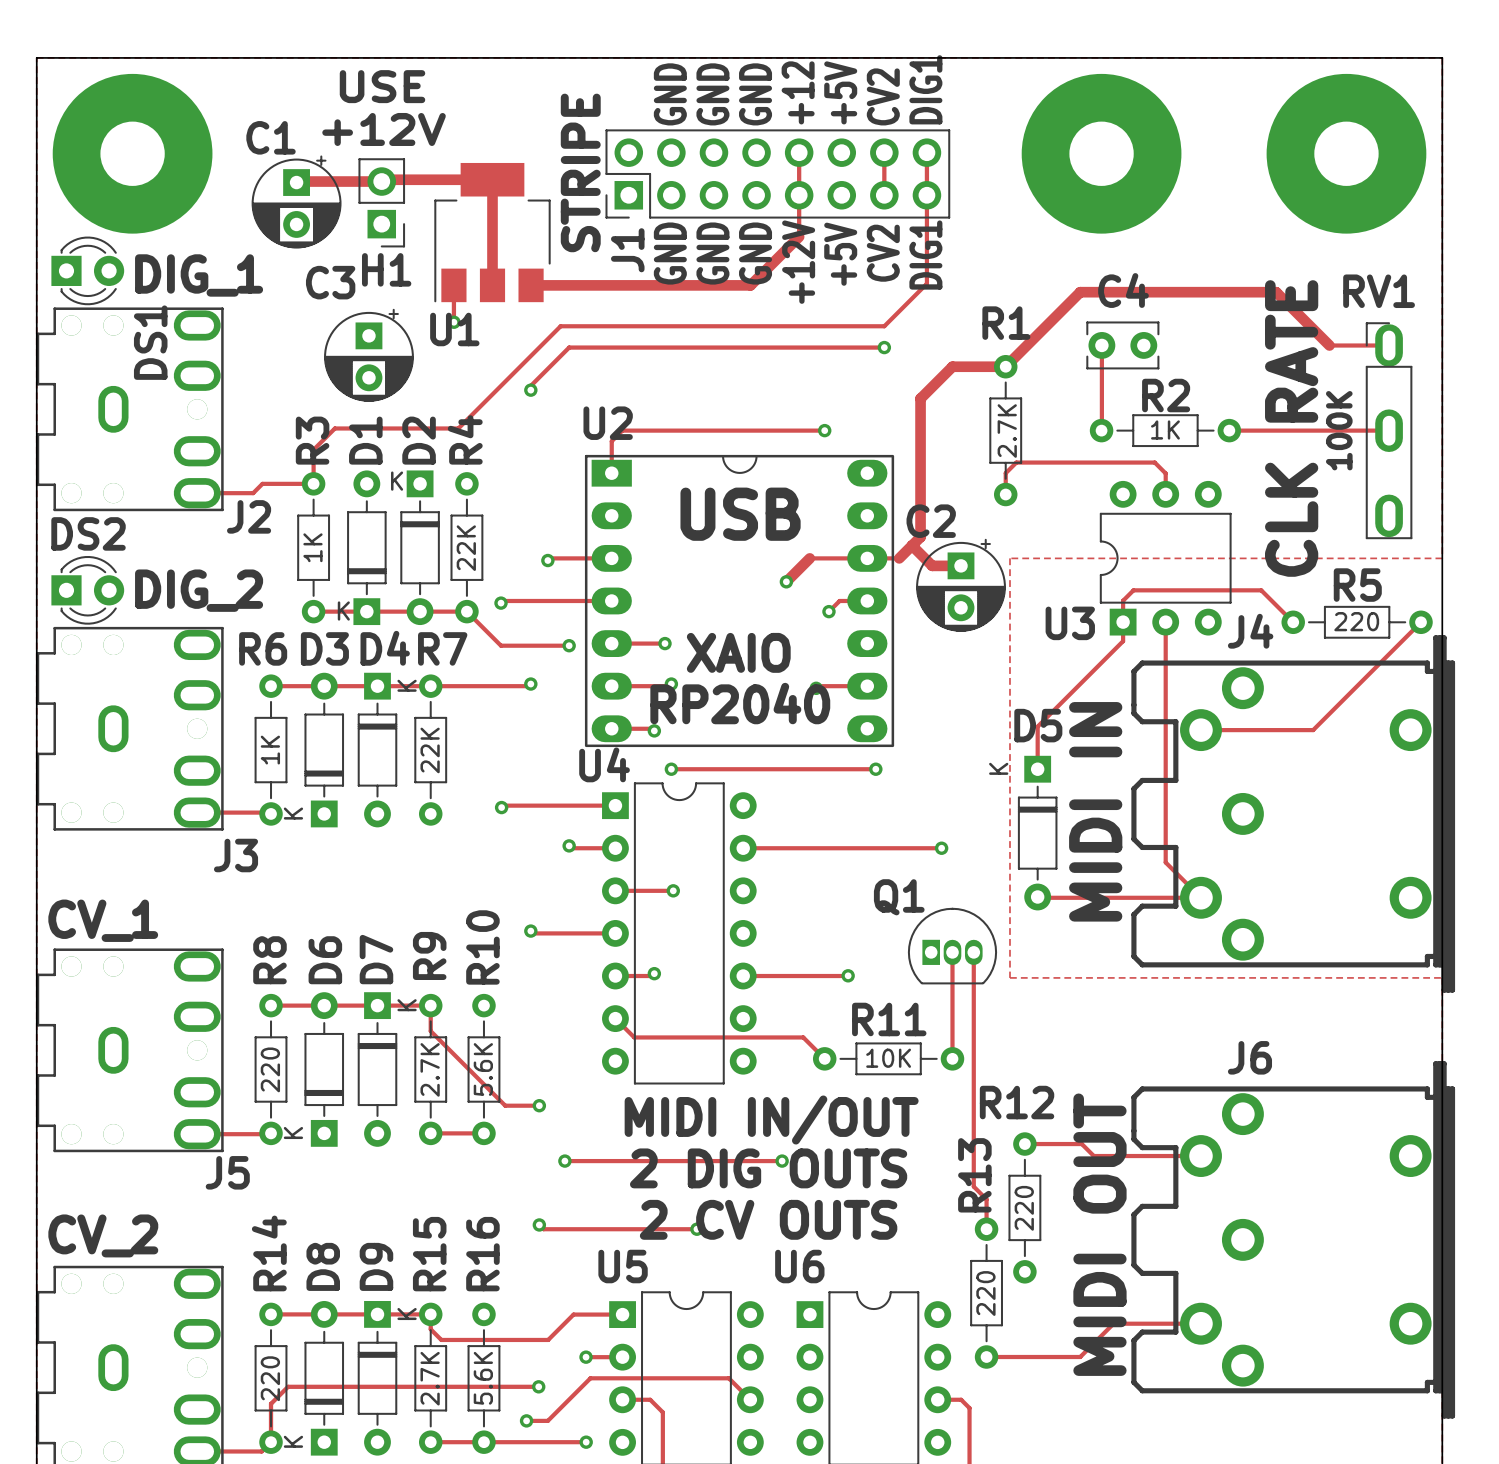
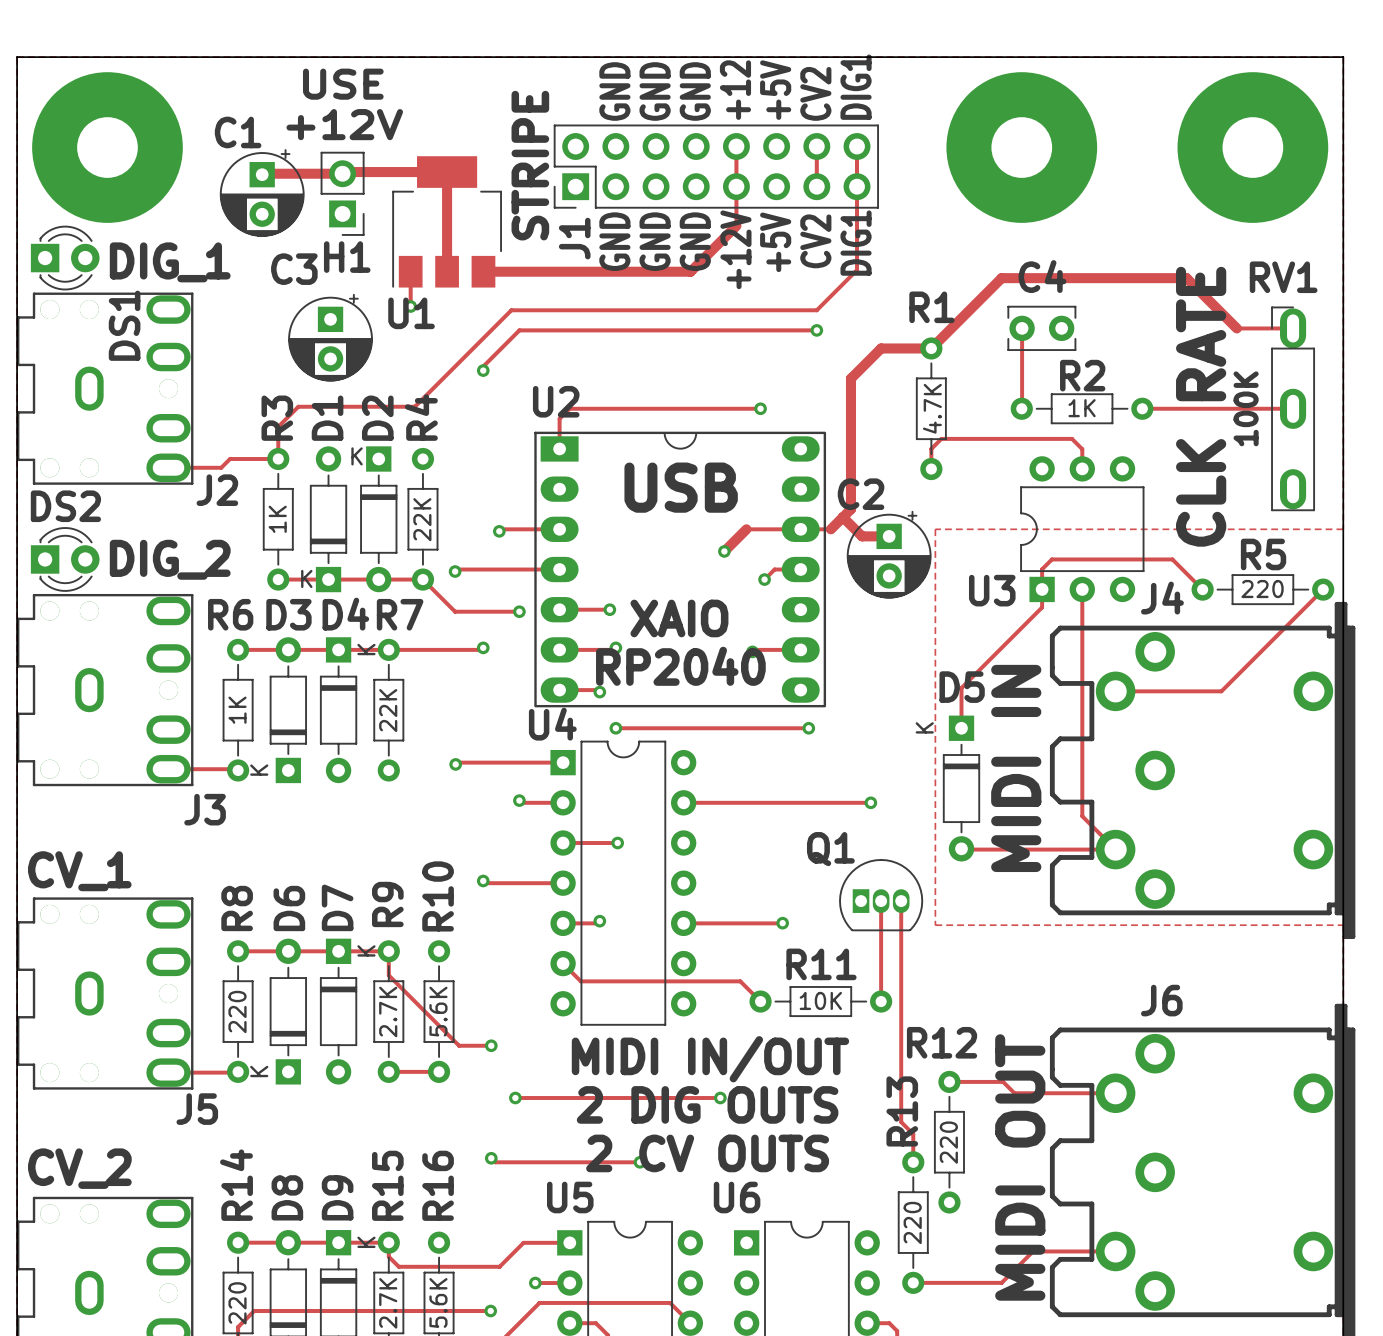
R1 value: 2.7K (1007, 431) -> 4.7K (932, 408)

